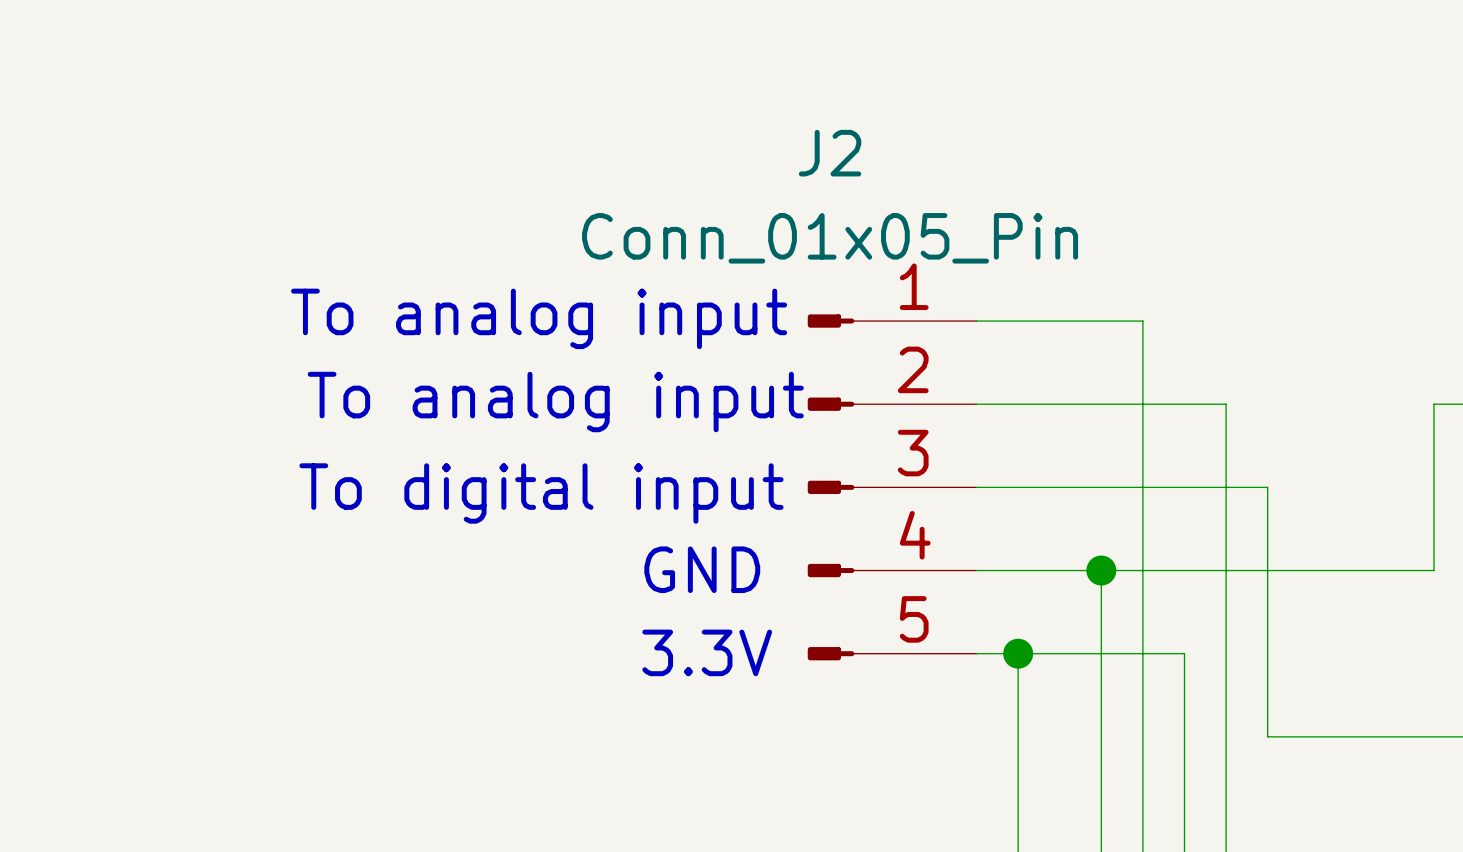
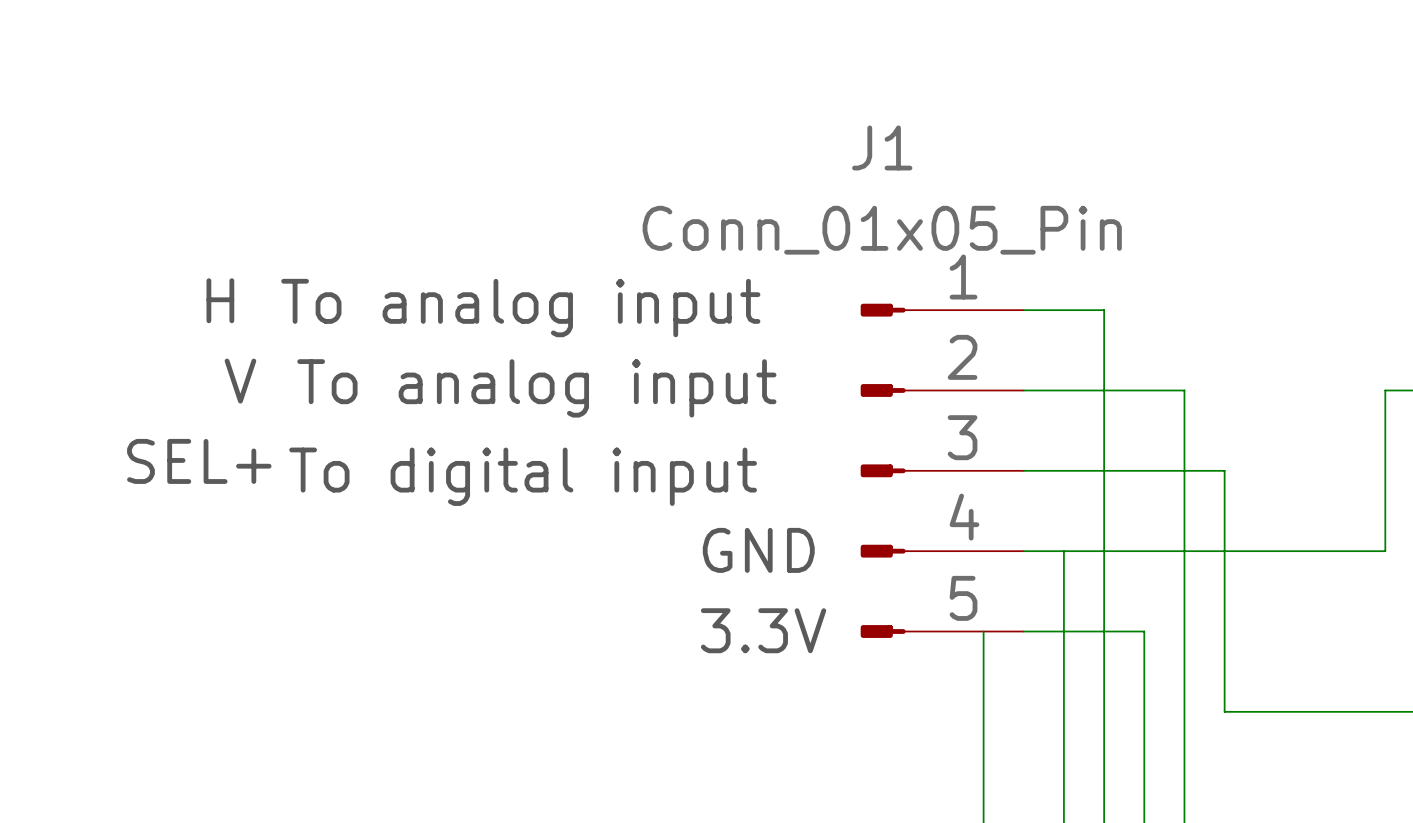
text: none -> H (220, 300)
text: none -> V (240, 381)
text: none -> SEL+ (199, 461)
J2: Conn_01x05_Pin (892, 487) -> none
J1: none -> Conn_01x05_Pin (942, 470)
text position: GND (702, 569) -> GND (758, 550)
junction: (1101, 570) -> none
text position: 3.3V (707, 652) -> 3.3V (763, 630)
junction: (1018, 653) -> none

